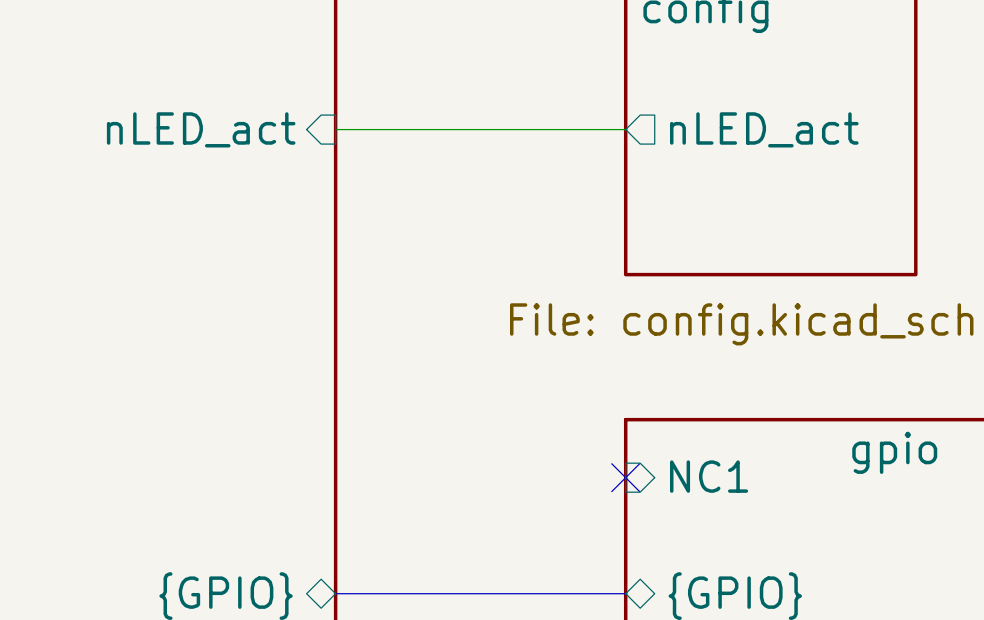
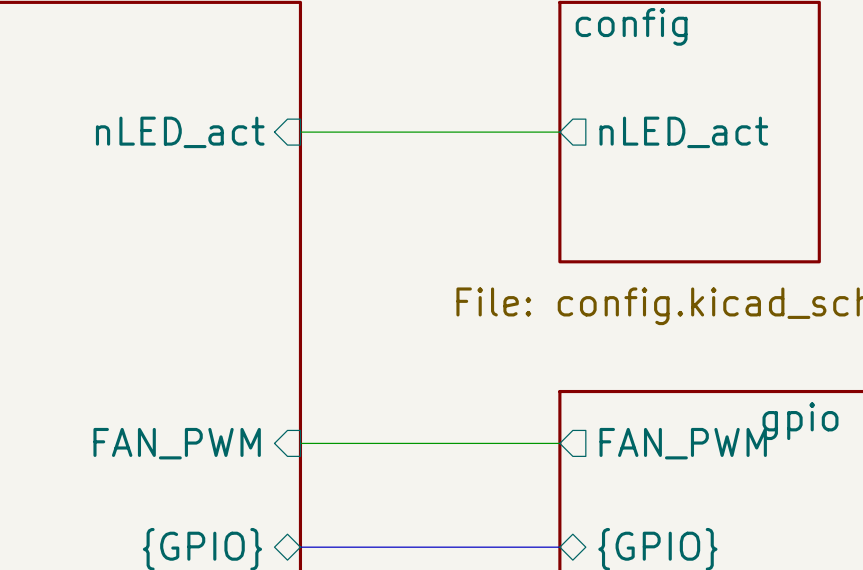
sheet pin shape: input (709, 476) -> output (683, 443)
sheet pin: NC1 (709, 476) -> FAN_PWM (683, 443)
sheet pin: none -> FAN_PWM (177, 443)
wire: none -> (300, 443) (559, 443)
no-connect mark: (625, 477) -> none

